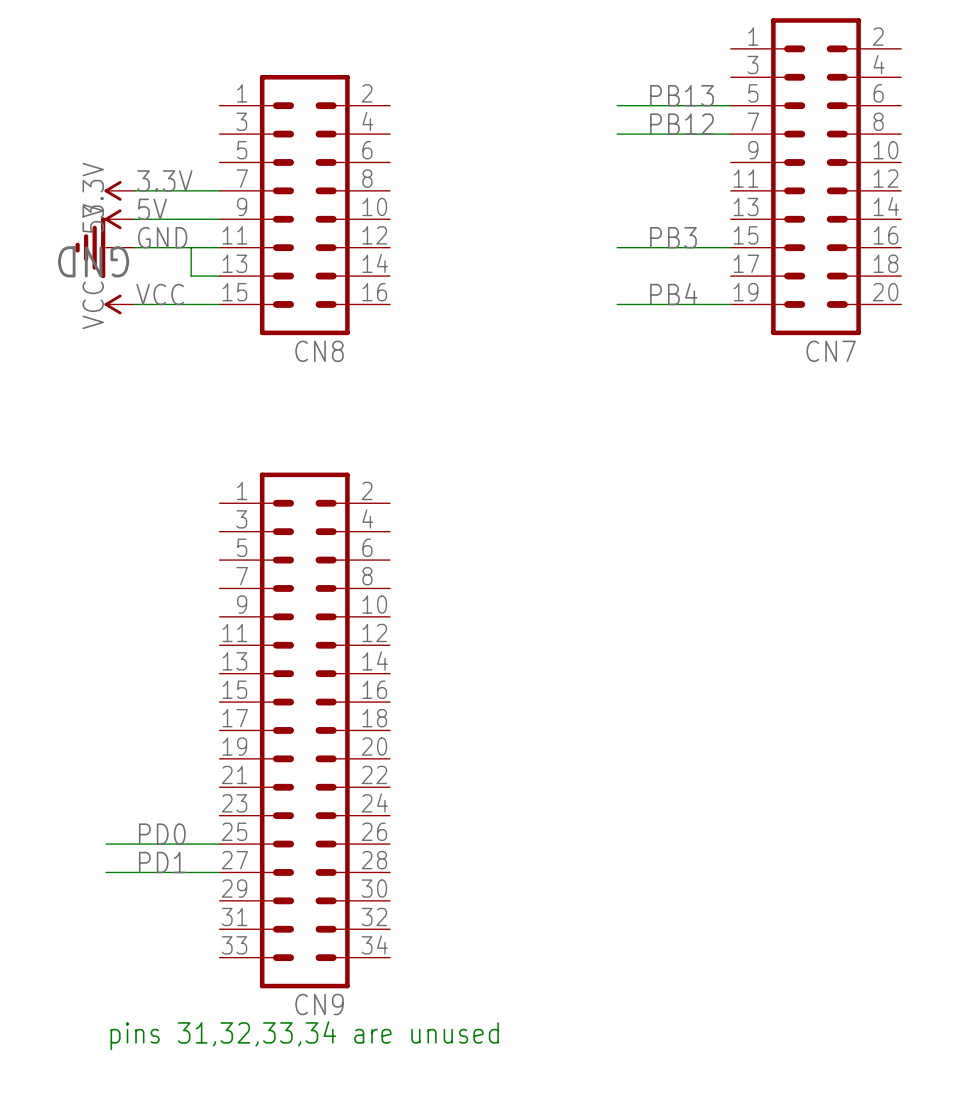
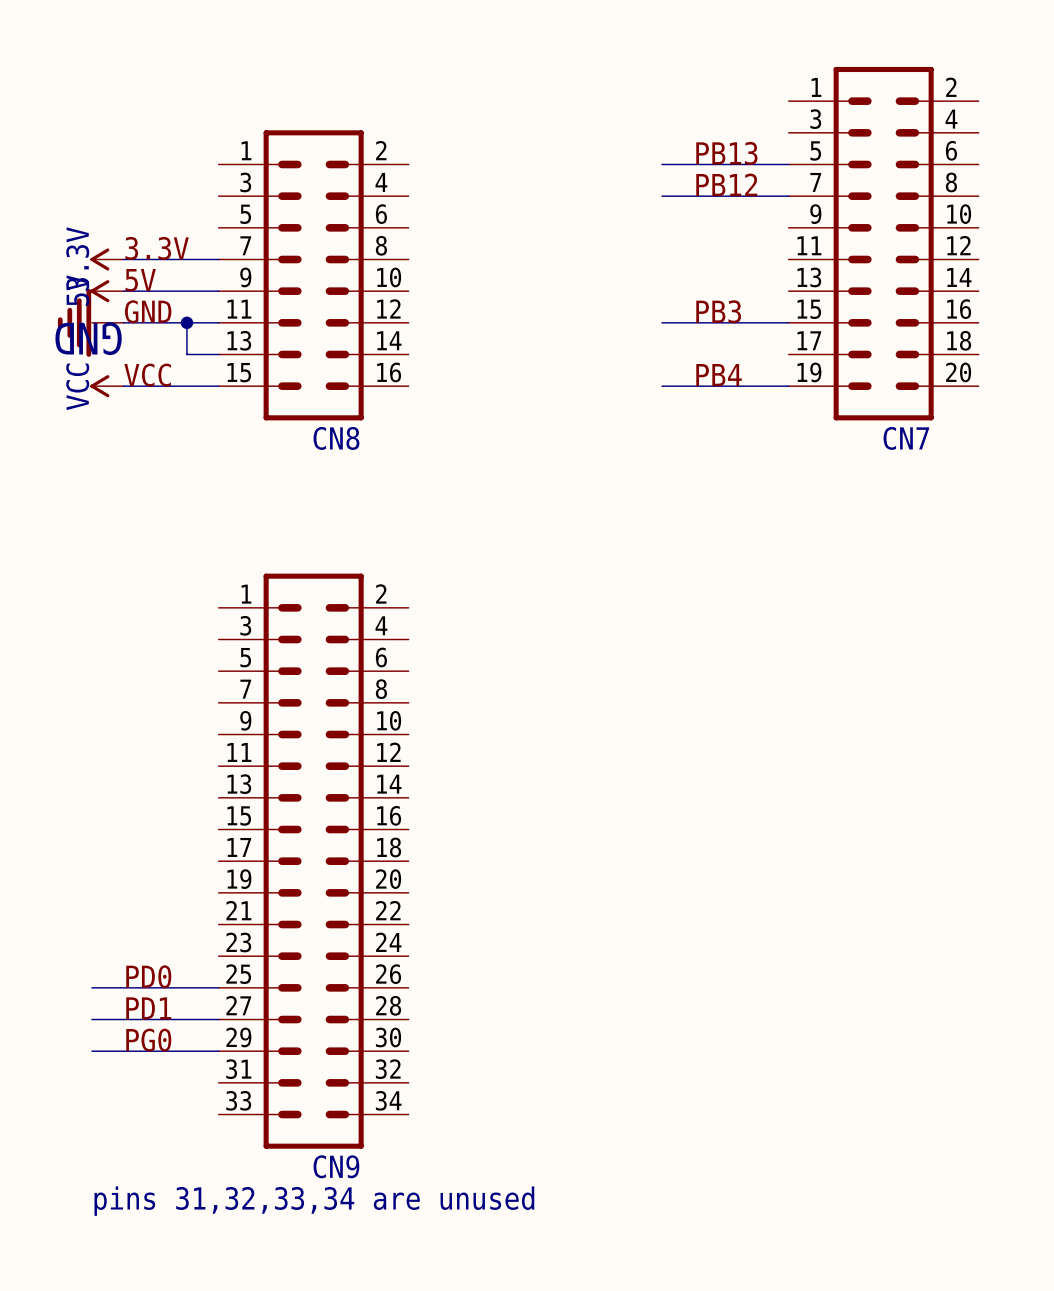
junction: none -> (186, 322)
label: none -> PG0 (148, 1040)
wire: none -> (91, 1051) (218, 1051)

